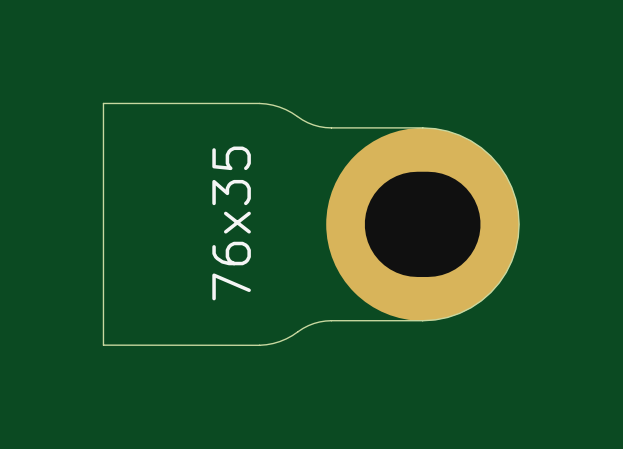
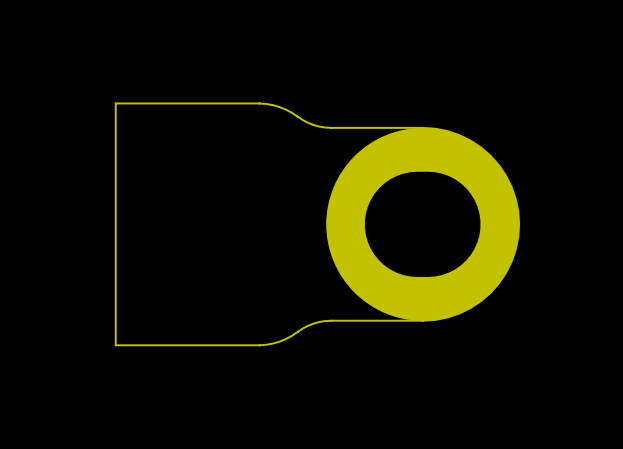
part footprint: [103, 103, 520, 346] -> [115, 103, 520, 346]
text: 76x35 (231, 223) -> none

